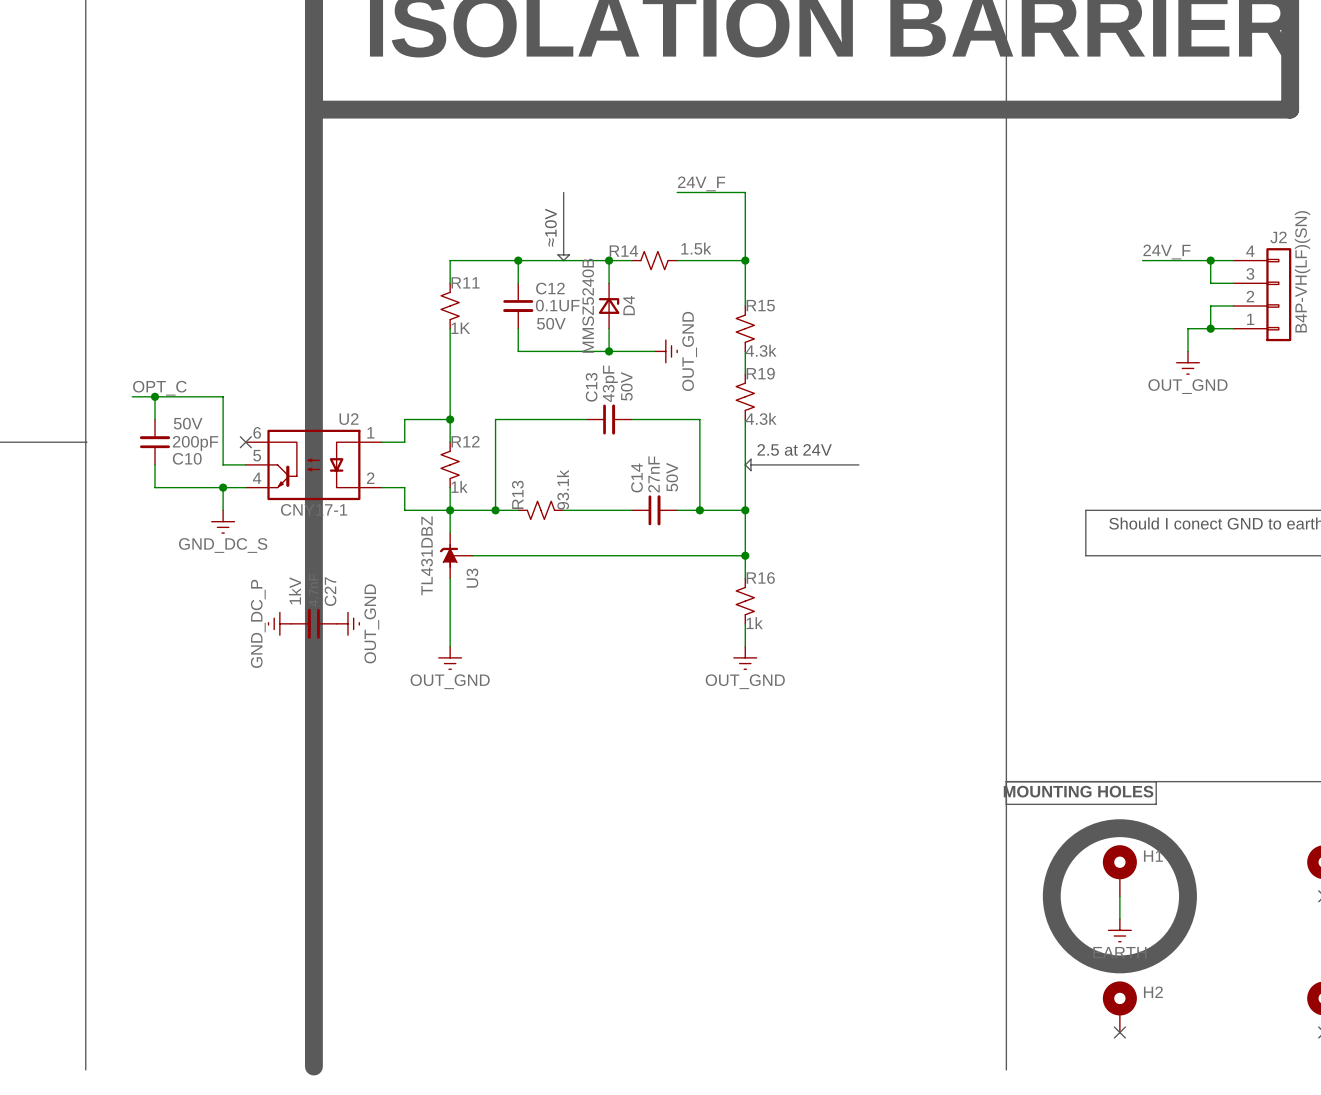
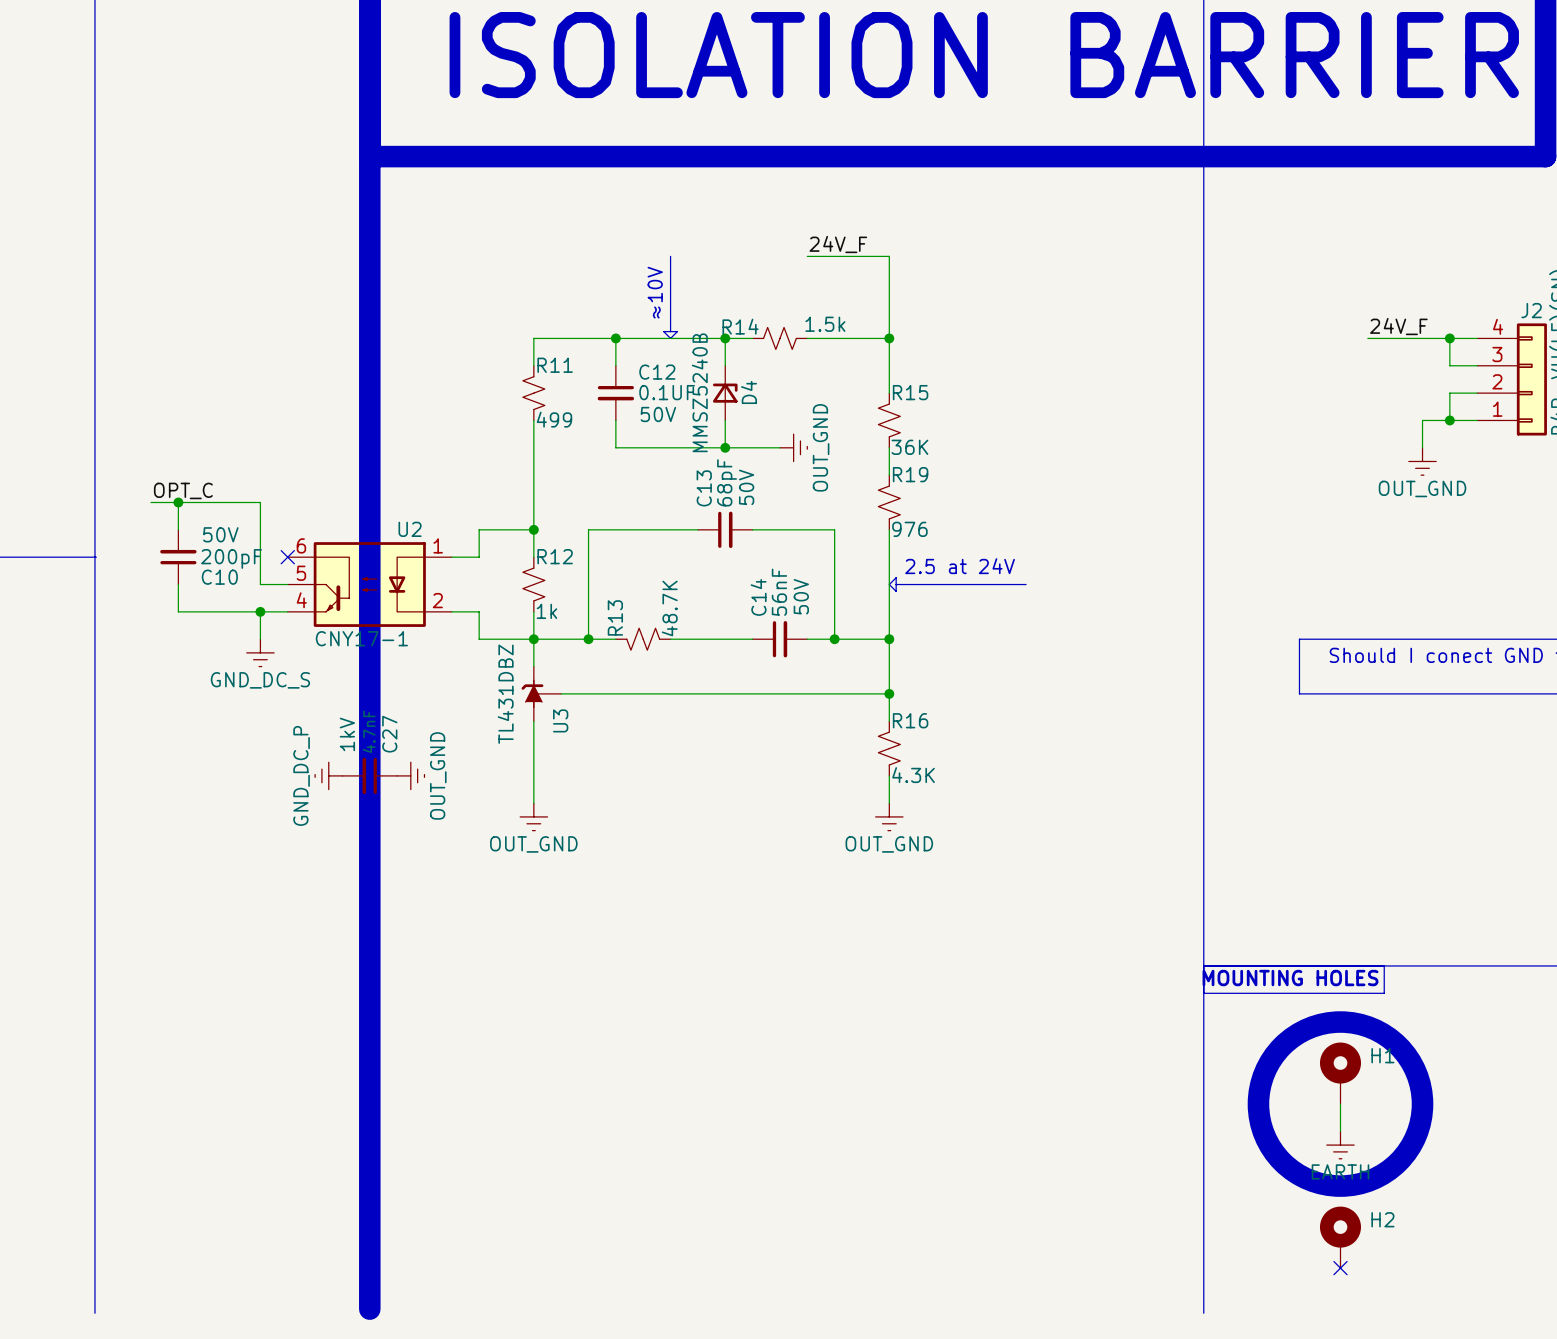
R11 value: 1K (460, 328) -> 499 (554, 419)
R15 value: 4.3k (761, 350) -> 36K (909, 447)
C13 value: 43pF (610, 383) -> 68pF (727, 482)
R19 value: 4.3k (761, 418) -> 976 (909, 529)
C14 value: 27nF (653, 474) -> 56nF (779, 592)
R13 value: 93.1k (563, 489) -> 48.7K (669, 608)
R16 value: 1k (754, 623) -> 4.3K (913, 775)

